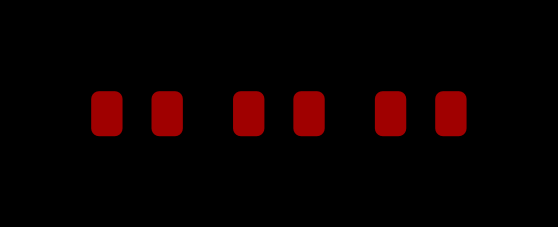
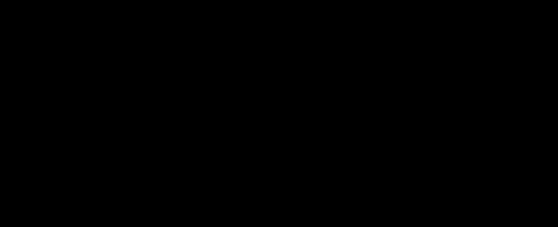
part: (137, 113) -> none
part: (278, 113) -> none
part: (420, 113) -> none

